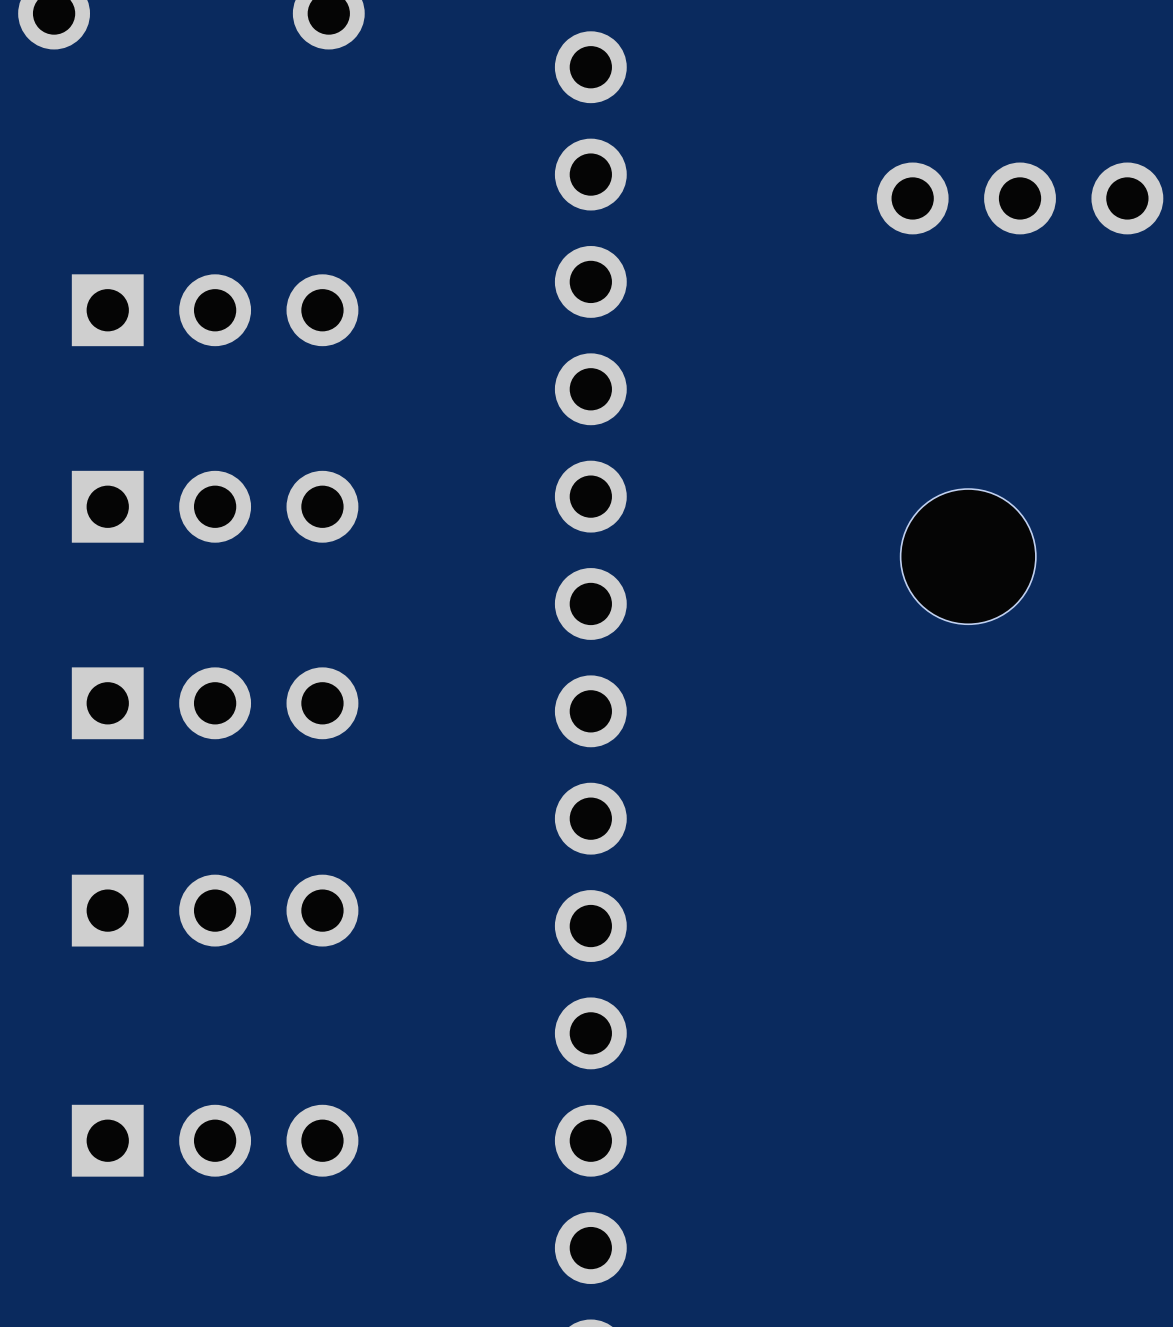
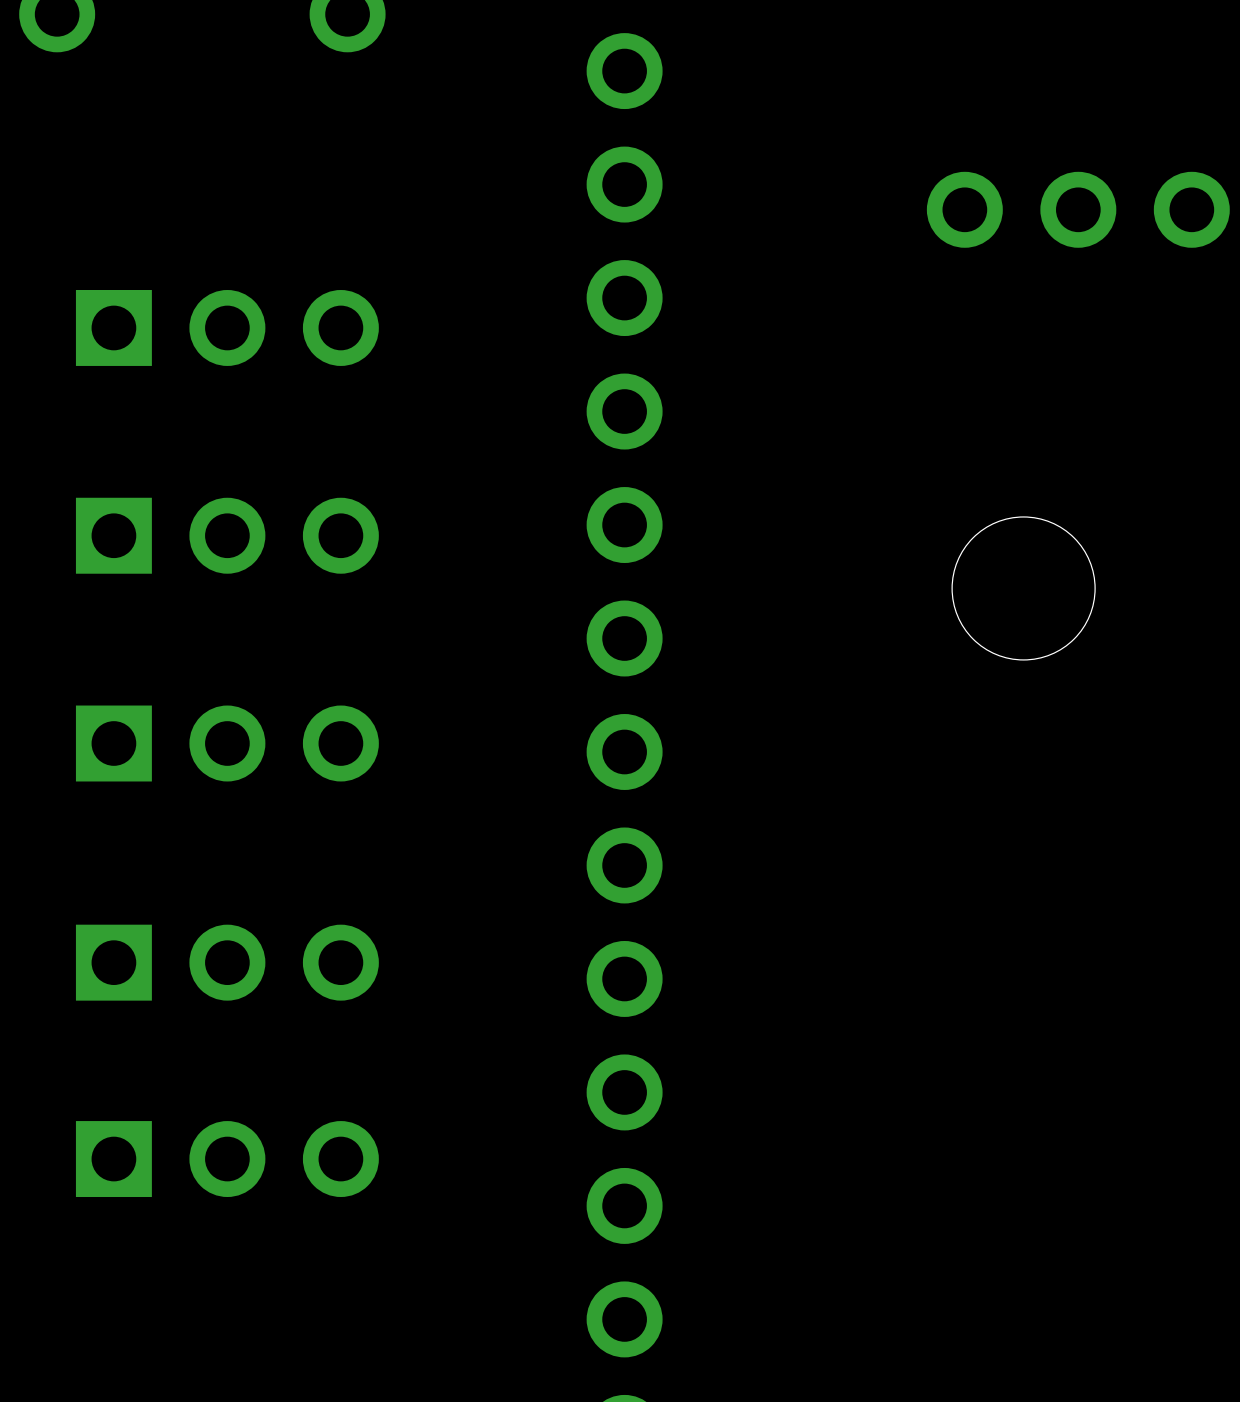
part position: (215, 1140) -> (227, 1159)

